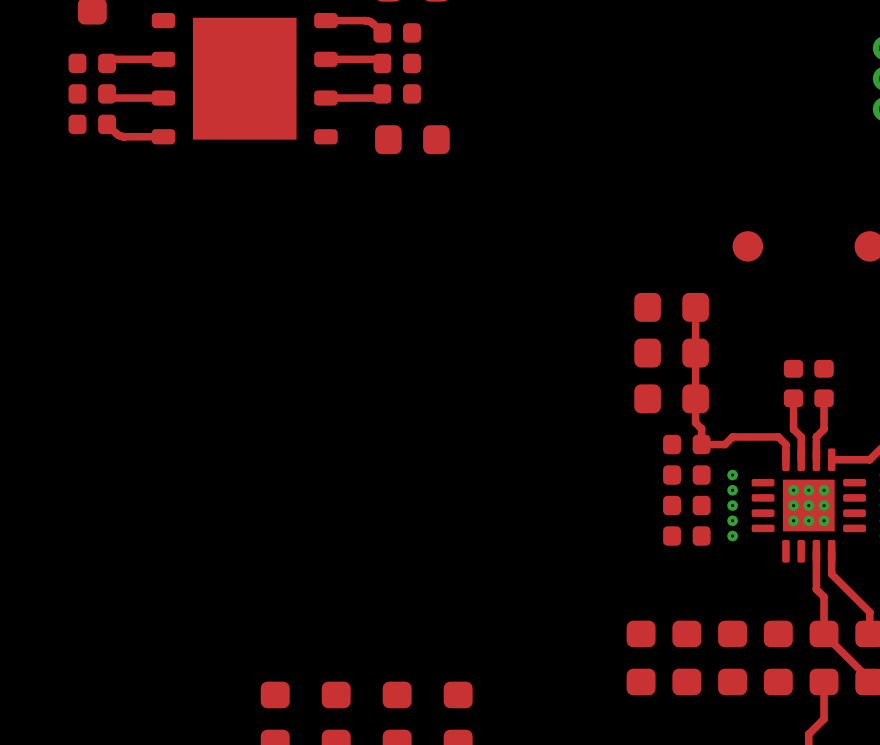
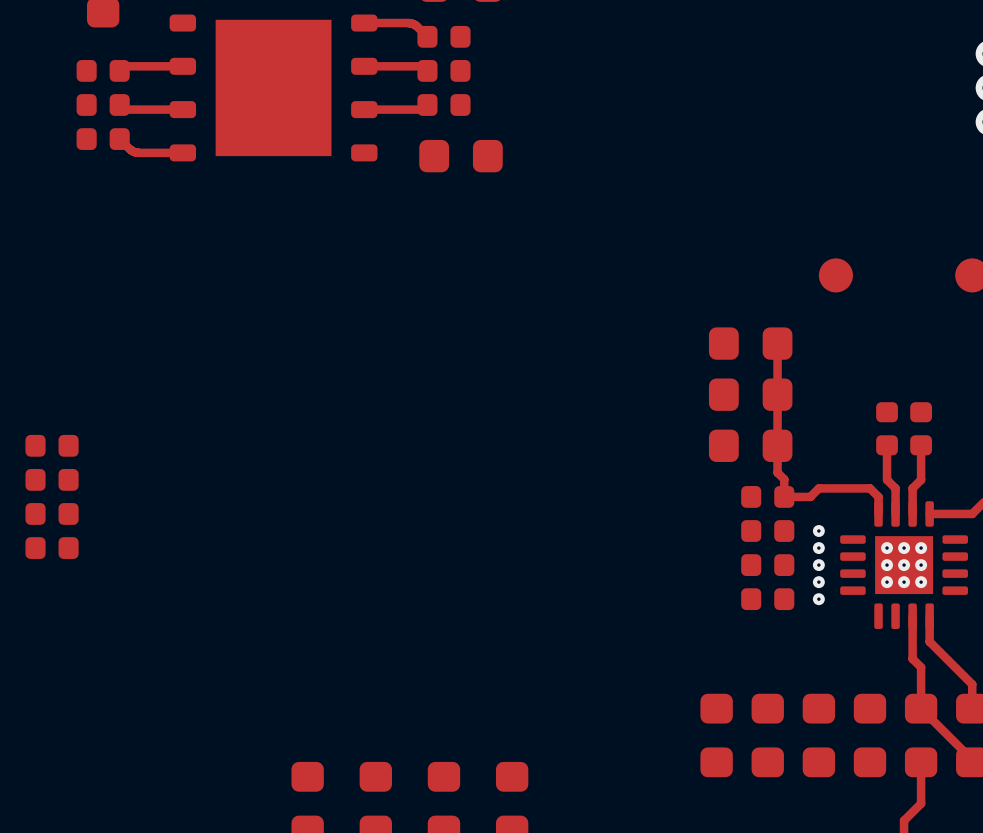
part: none -> (52, 445)
part: none -> (52, 479)
part: none -> (52, 513)
part: none -> (52, 548)

